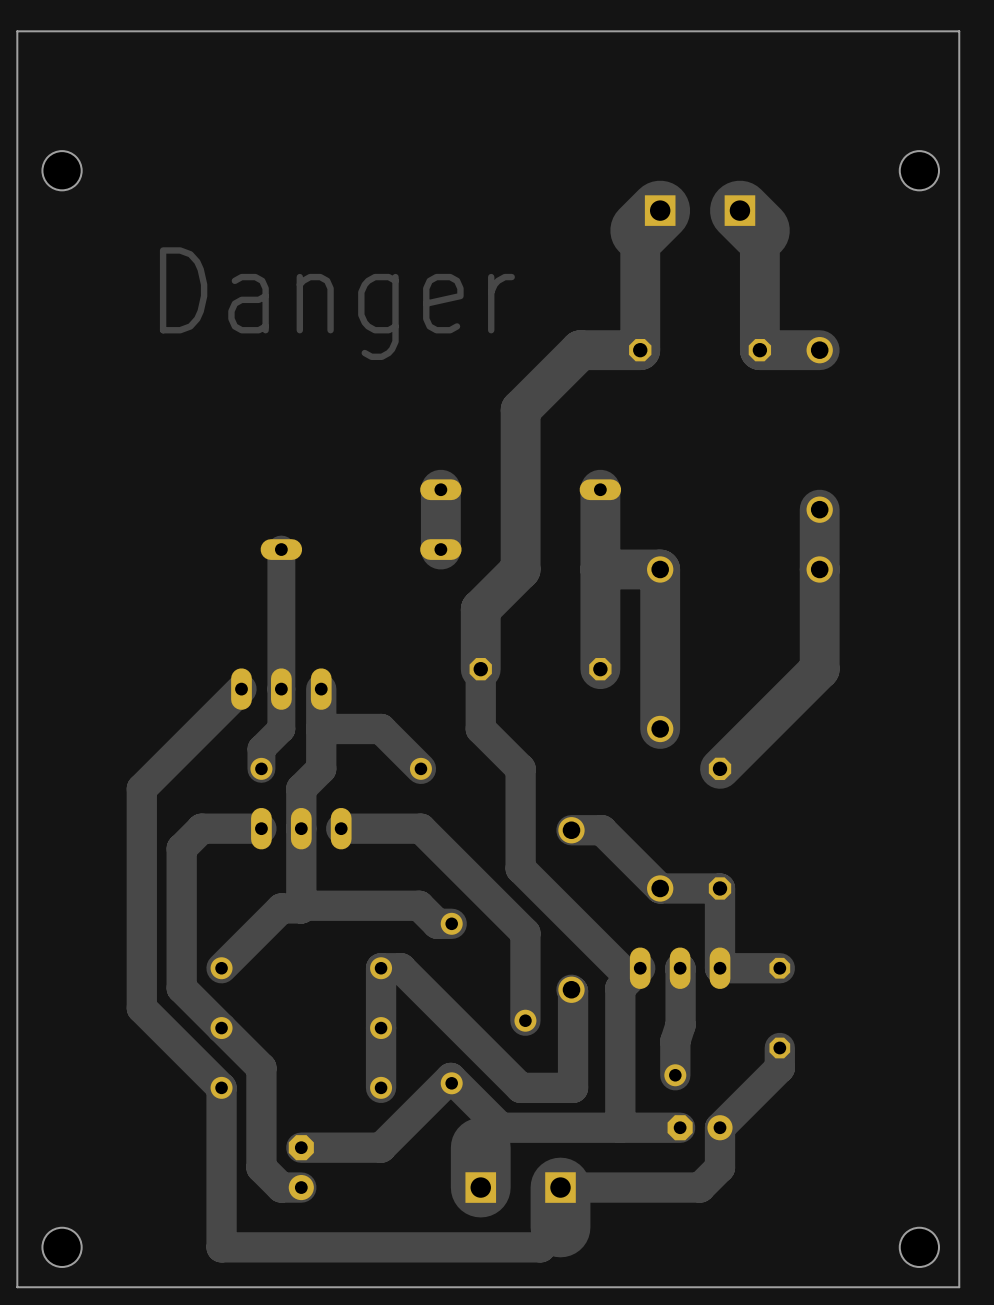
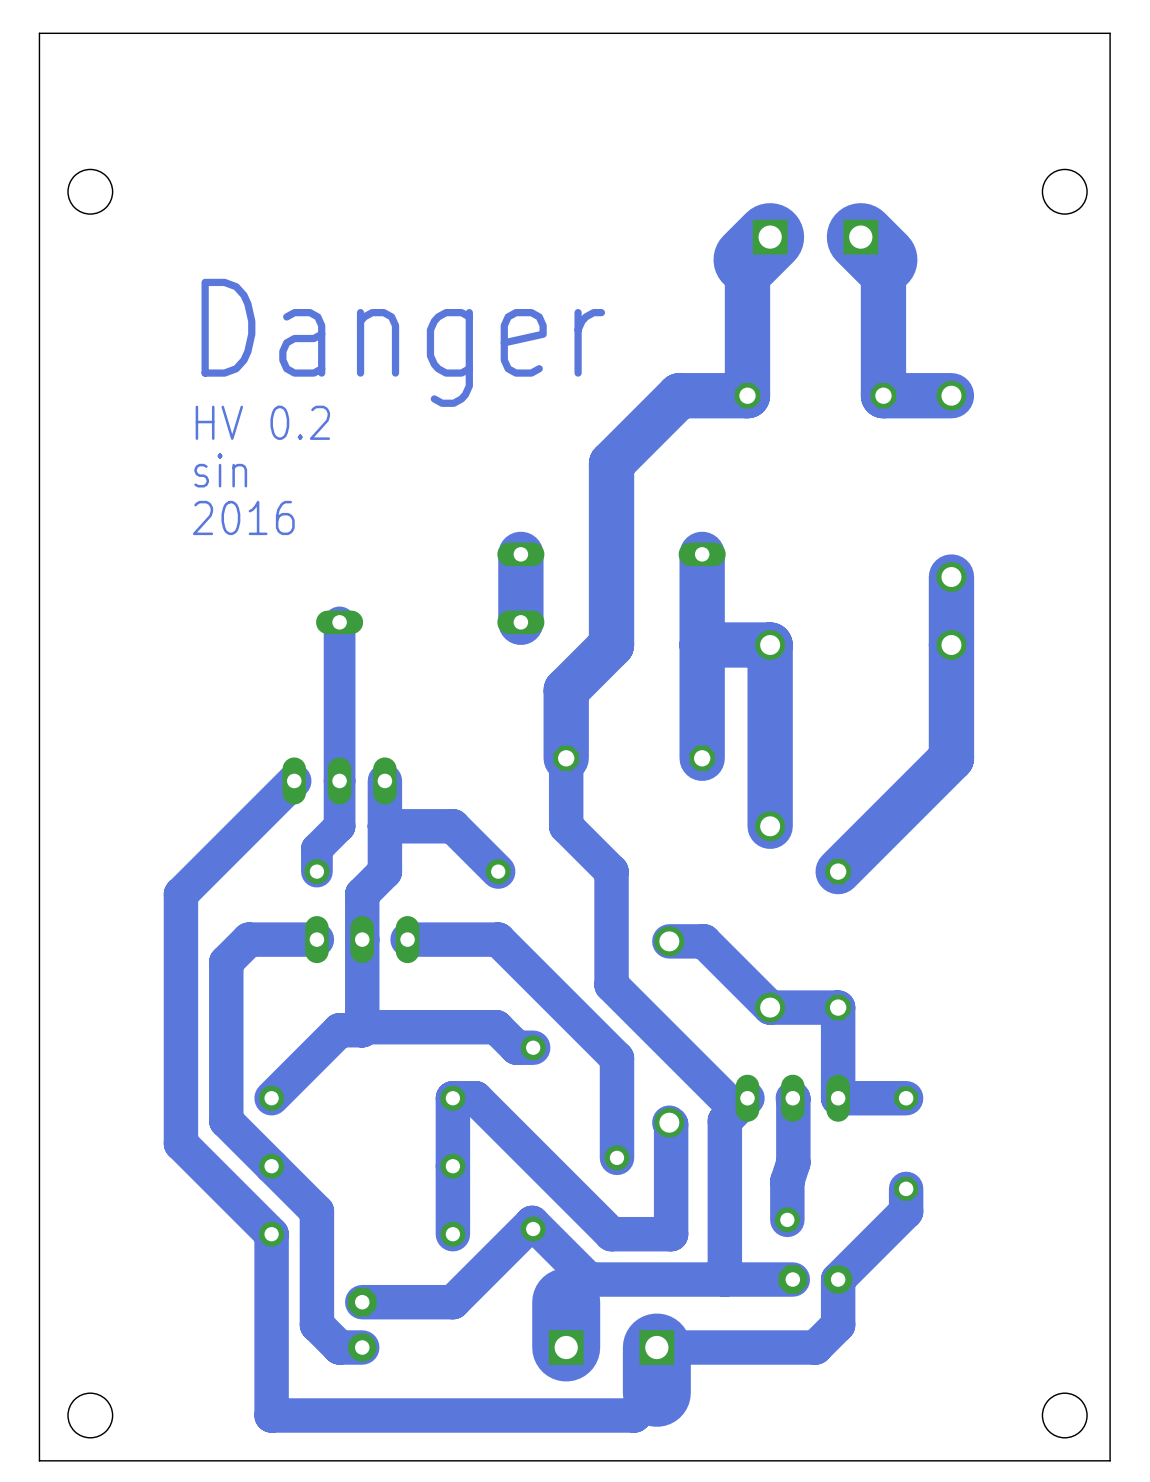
text: none -> HV 0.2 (262, 422)
text: none -> sin (220, 470)
text: none -> 2016 (243, 517)

